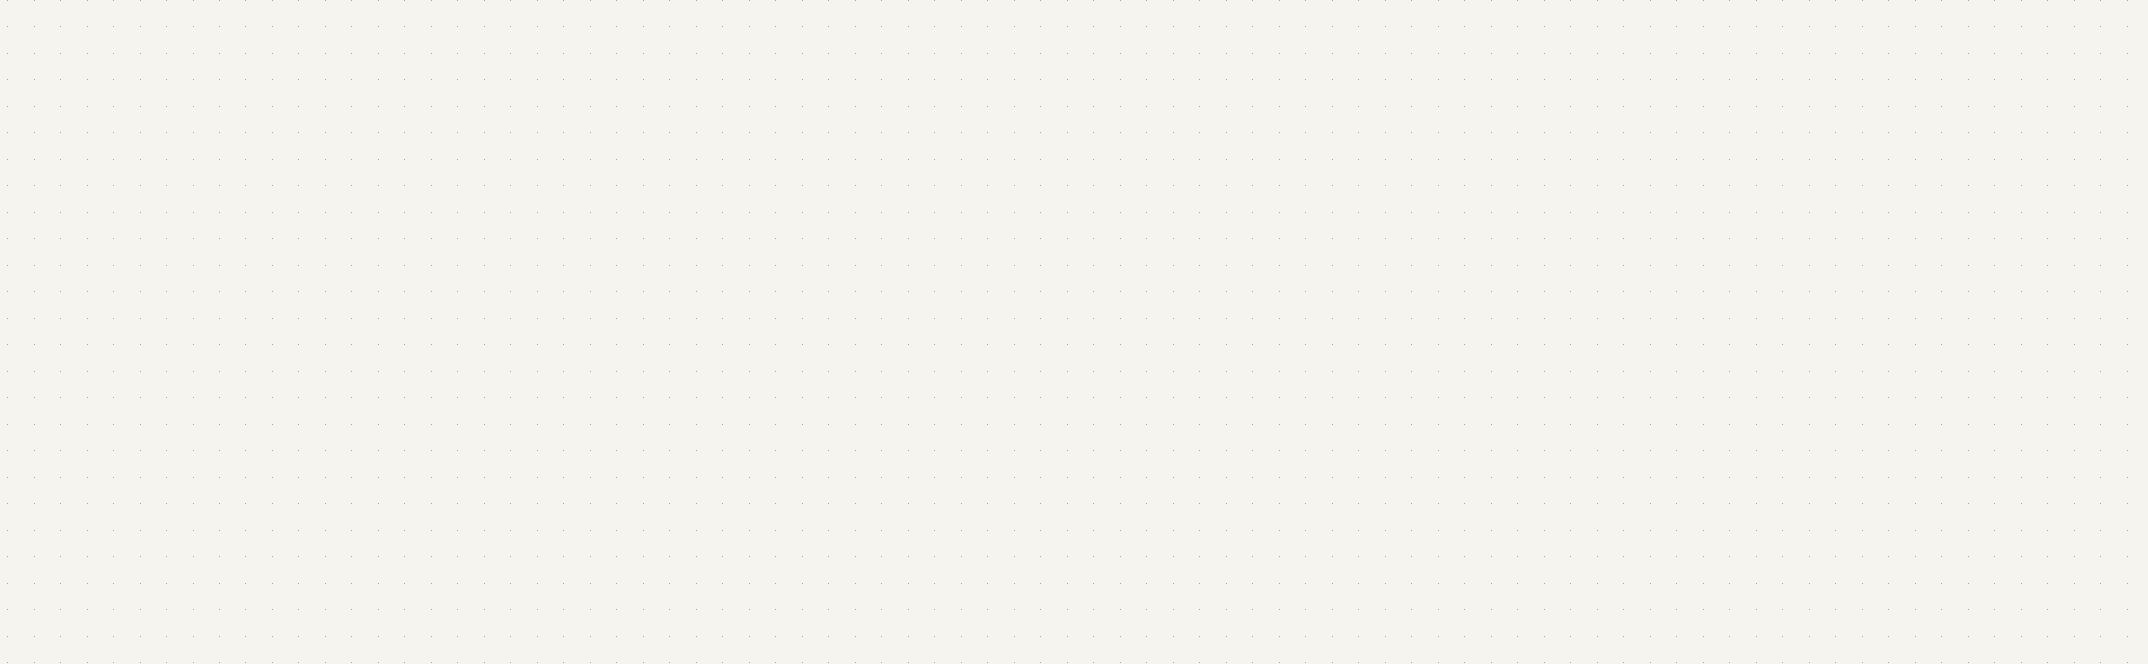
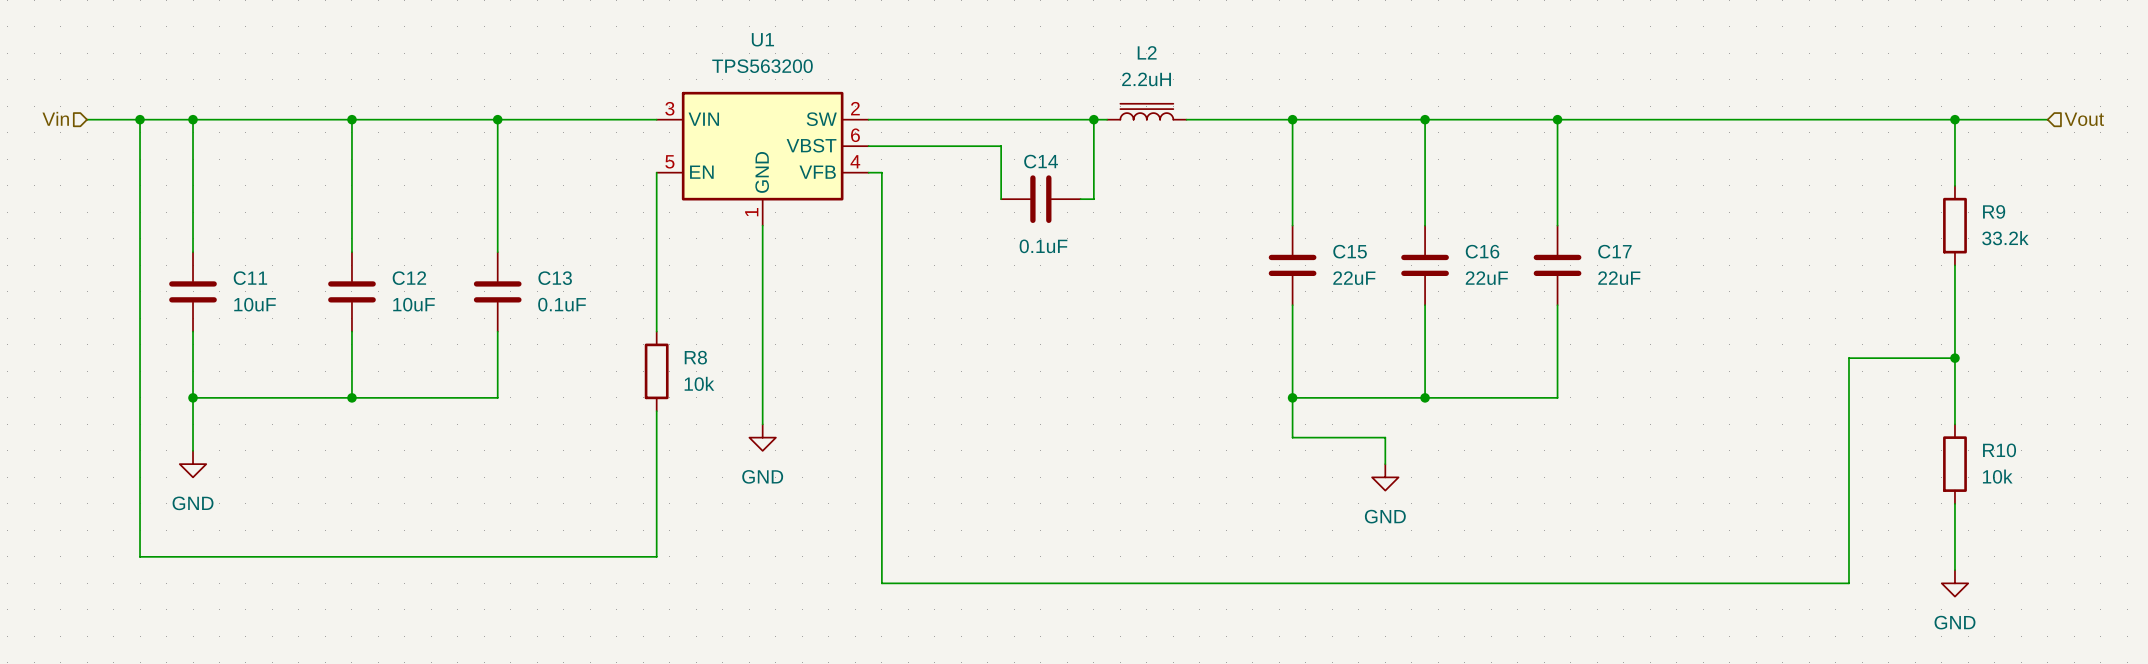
L2: none -> 2.2uH (1146, 111)
hierarchical label: none -> Vin (55, 118)
wire: none -> (87, 119) (656, 119)
wire: none -> (140, 119) (140, 556) (656, 556) (656, 411)
junction: none -> (140, 119)
wire: none -> (193, 119) (193, 252)
junction: none -> (193, 119)
wire: none -> (351, 119) (351, 252)
junction: none -> (351, 119)
wire: none -> (497, 119) (497, 252)
junction: none -> (497, 119)
wire: none -> (868, 119) (1107, 119)
wire: none -> (1093, 119) (1093, 199) (1080, 199)
junction: none -> (1093, 119)
wire: none -> (1186, 119) (2047, 119)
wire: none -> (1292, 119) (1292, 225)
junction: none -> (1292, 119)
wire: none -> (1425, 119) (1425, 225)
junction: none -> (1425, 119)
wire: none -> (1557, 119) (1557, 225)
junction: none -> (1557, 119)
wire: none -> (1954, 119) (1954, 185)
junction: none -> (1954, 119)
hierarchical label: none -> Vout (2084, 119)
wire: none -> (868, 146) (1001, 146) (1001, 199)
U1: none -> TPS563200 (762, 158)
wire: none -> (656, 172) (656, 331)
wire: none -> (868, 172) (881, 172) (881, 583) (1848, 583) (1848, 358) (1954, 358)
C14: none -> 0.1uF (1040, 199)
wire: none -> (762, 225) (762, 424)
R9: none -> 33.2k (1954, 225)
C15: none -> 22uF (1292, 265)
C16: none -> 22uF (1425, 265)
C17: none -> 22uF (1557, 265)
wire: none -> (1954, 265) (1954, 424)
C11: none -> 10uF (193, 291)
C12: none -> 10uF (351, 291)
C13: none -> 0.1uF (497, 291)
wire: none -> (1292, 305) (1292, 437) (1385, 437) (1385, 464)
wire: none -> (1425, 305) (1425, 397)
wire: none -> (1557, 305) (1557, 397) (1292, 397)
wire: none -> (193, 331) (193, 450)
wire: none -> (351, 331) (351, 397)
wire: none -> (497, 331) (497, 397) (193, 397)
junction: none -> (1954, 358)
R8: none -> 10k (656, 371)
junction: none -> (193, 397)
junction: none -> (351, 397)
junction: none -> (1292, 397)
junction: none -> (1425, 397)
power symbol: none -> GND (762, 437)
power symbol: none -> GND (193, 464)
R10: none -> 10k (1954, 464)
power symbol: none -> GND (1385, 477)
wire: none -> (1954, 503) (1954, 570)
power symbol: none -> GND (1954, 583)

